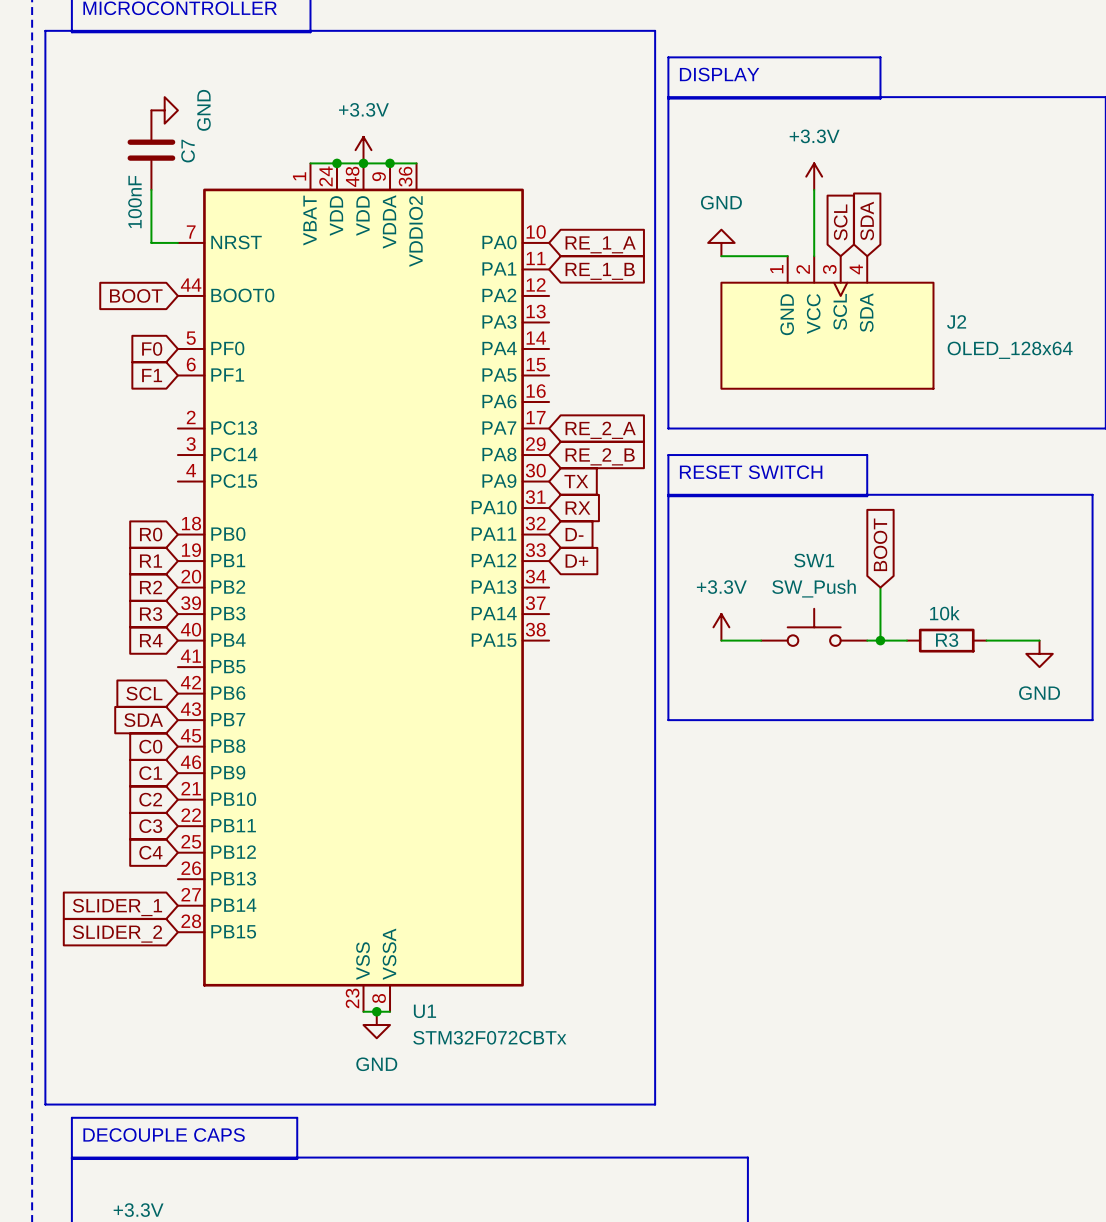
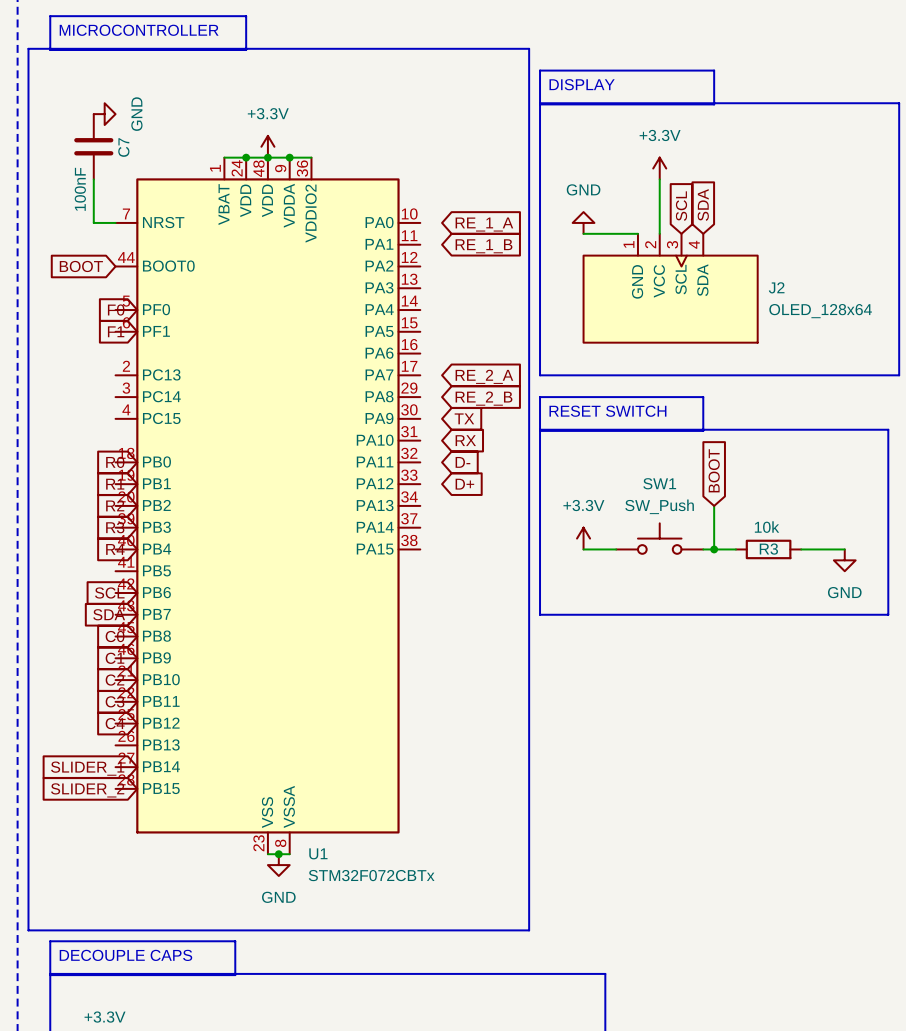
power symbol position: GND (164, 110) -> GND (104, 114)
C7 position: (151, 150) -> (93, 146)
power symbol position: +3.3V (363, 150) -> +3.3V (267, 146)
junction: none -> (246, 157)
wire: (390, 163) (416, 163) -> (224, 157) (246, 157)
junction: (390, 163) -> none
wire: (151, 189) (151, 242) (177, 242) -> (93, 179) (93, 222) (115, 222)
global label position: BOOT (136, 295) -> BOOT (81, 266)
U1 position: (363, 587) -> (267, 505)
wire: (363, 1011) (390, 1011) -> (289, 854) (267, 854)
junction position: (376, 1011) -> (278, 854)
power symbol position: GND (376, 1025) -> GND (278, 865)

